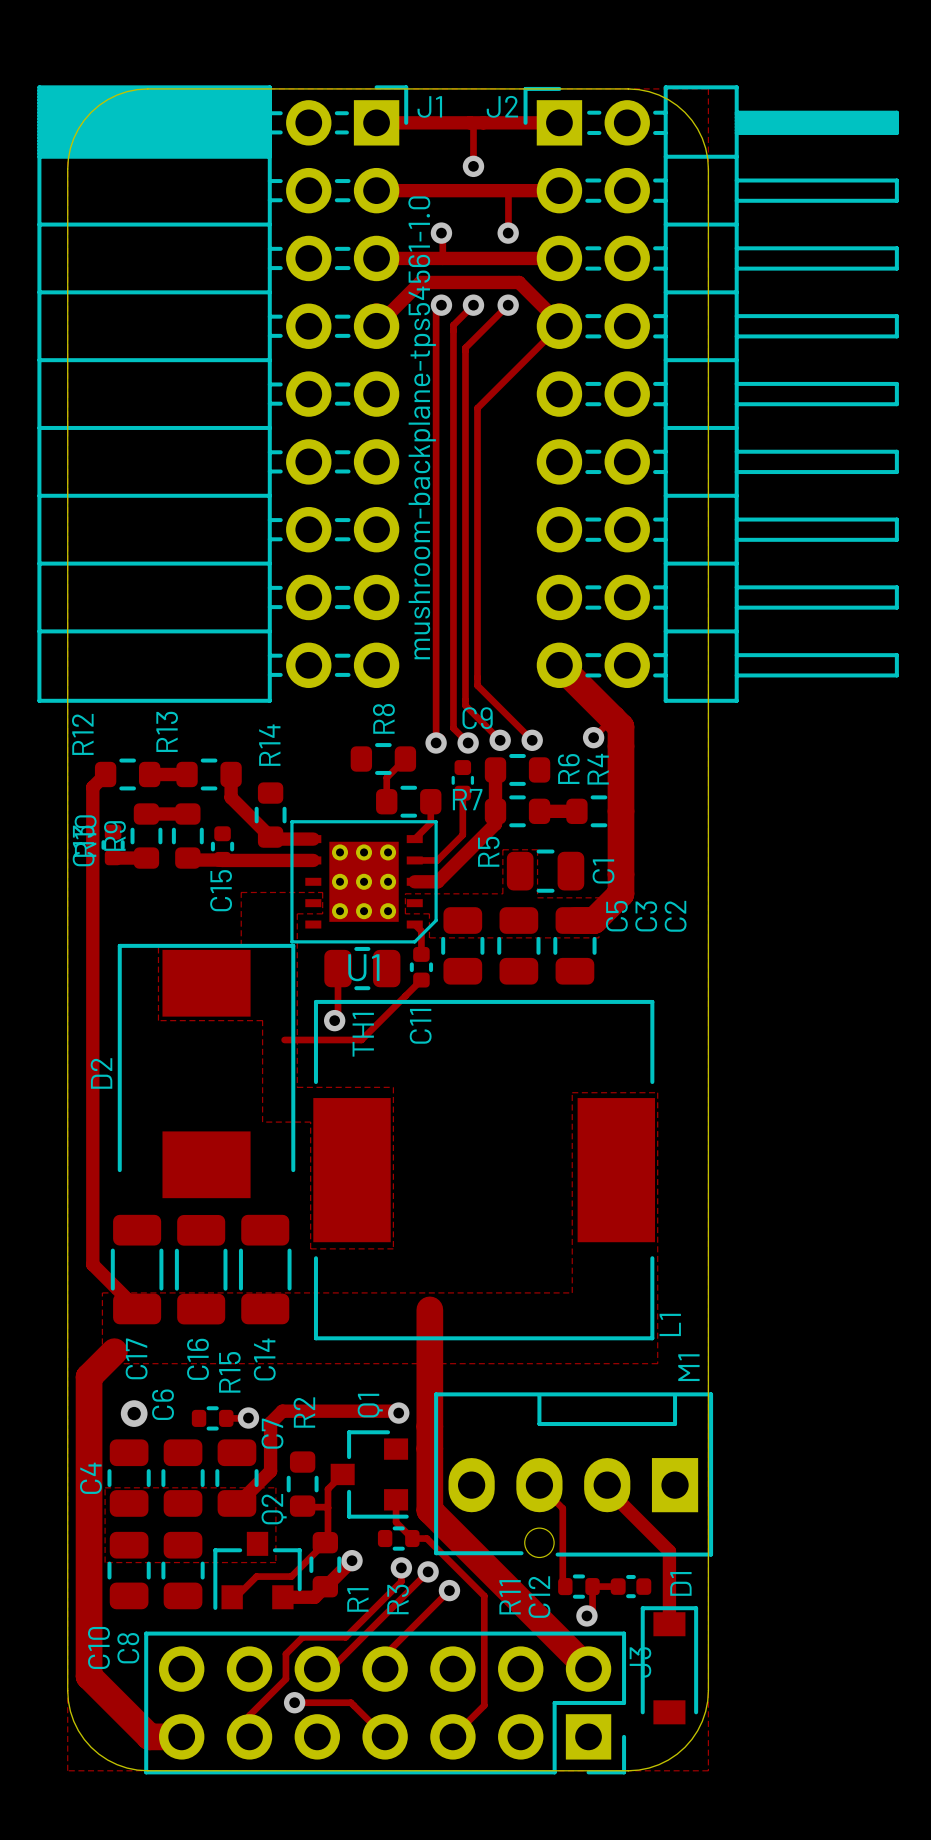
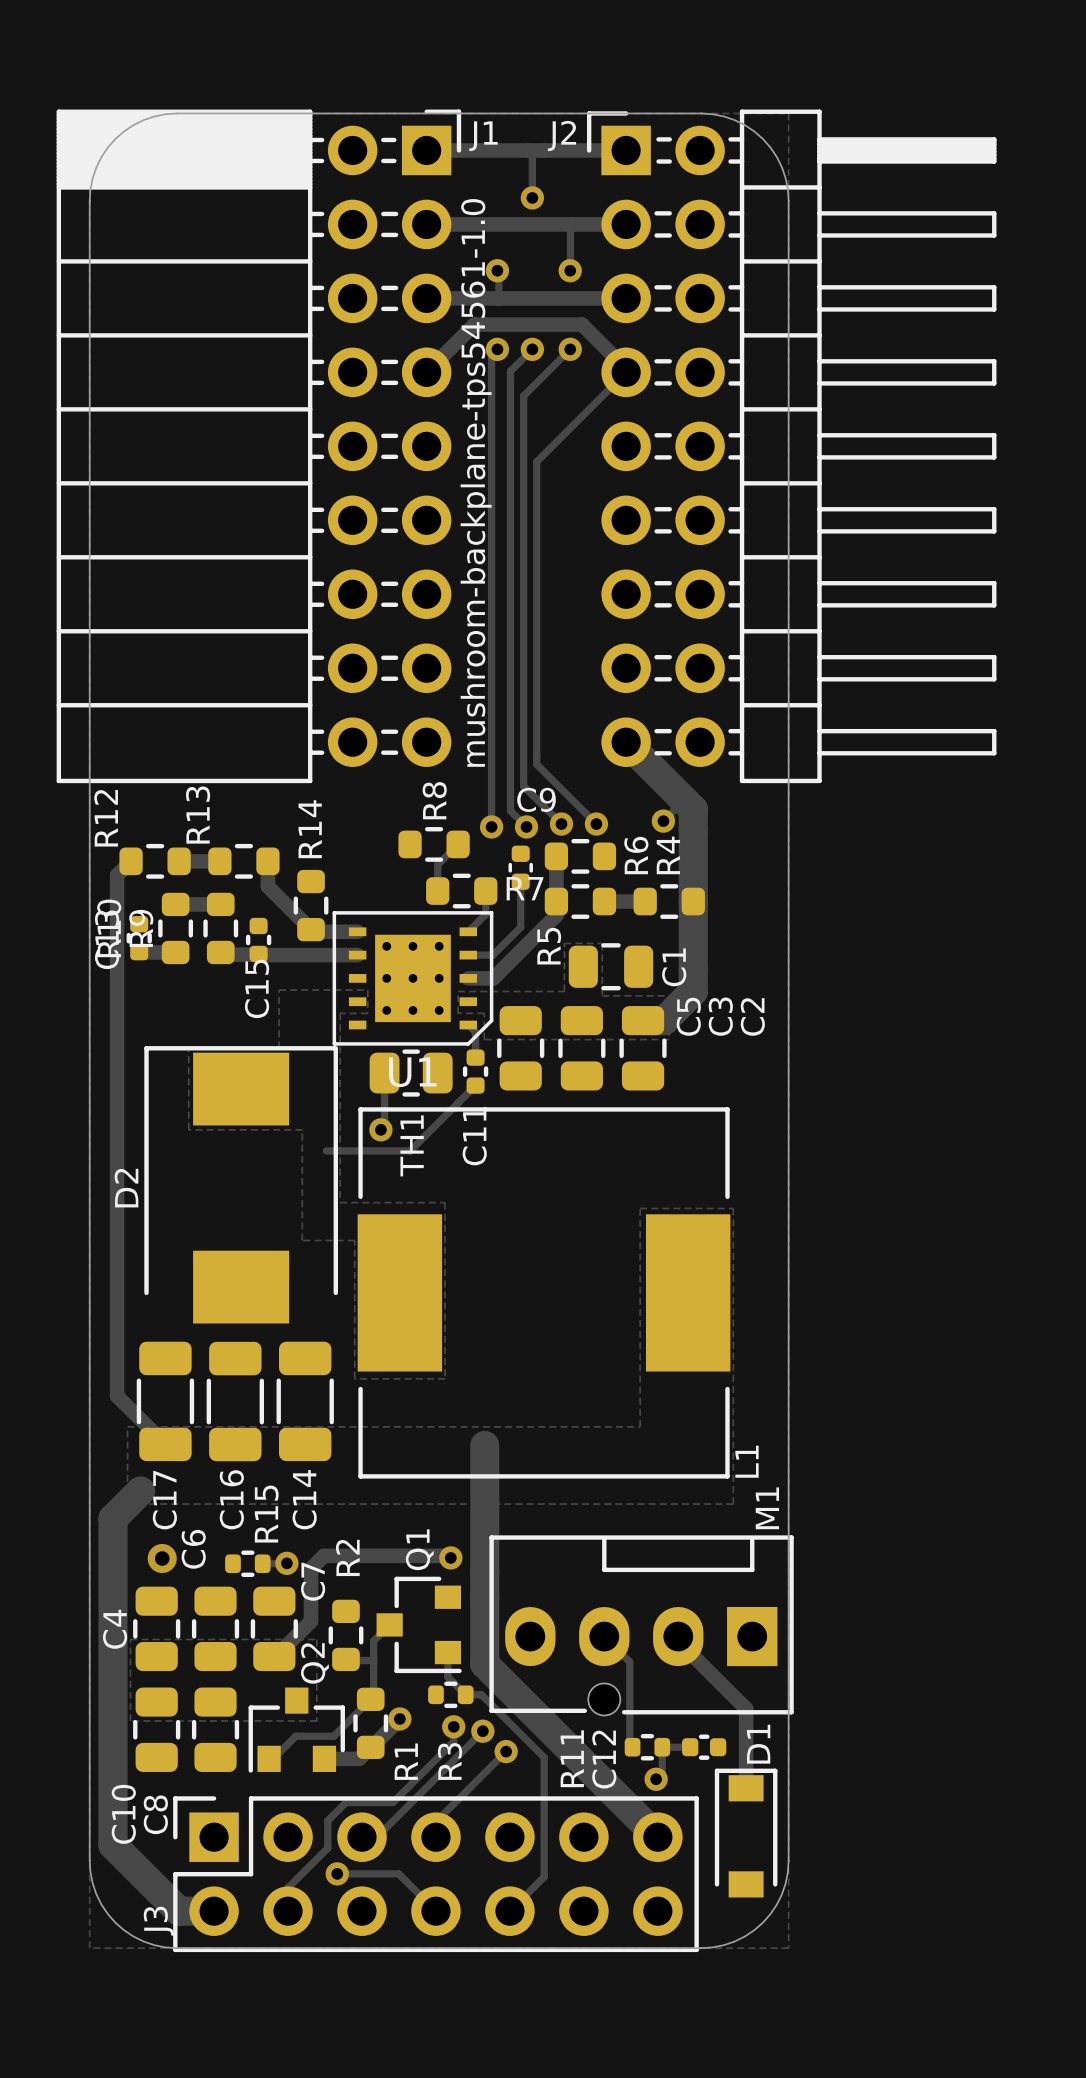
J3 rotation: 0° (385, 1702) -> 180° (435, 1874)

